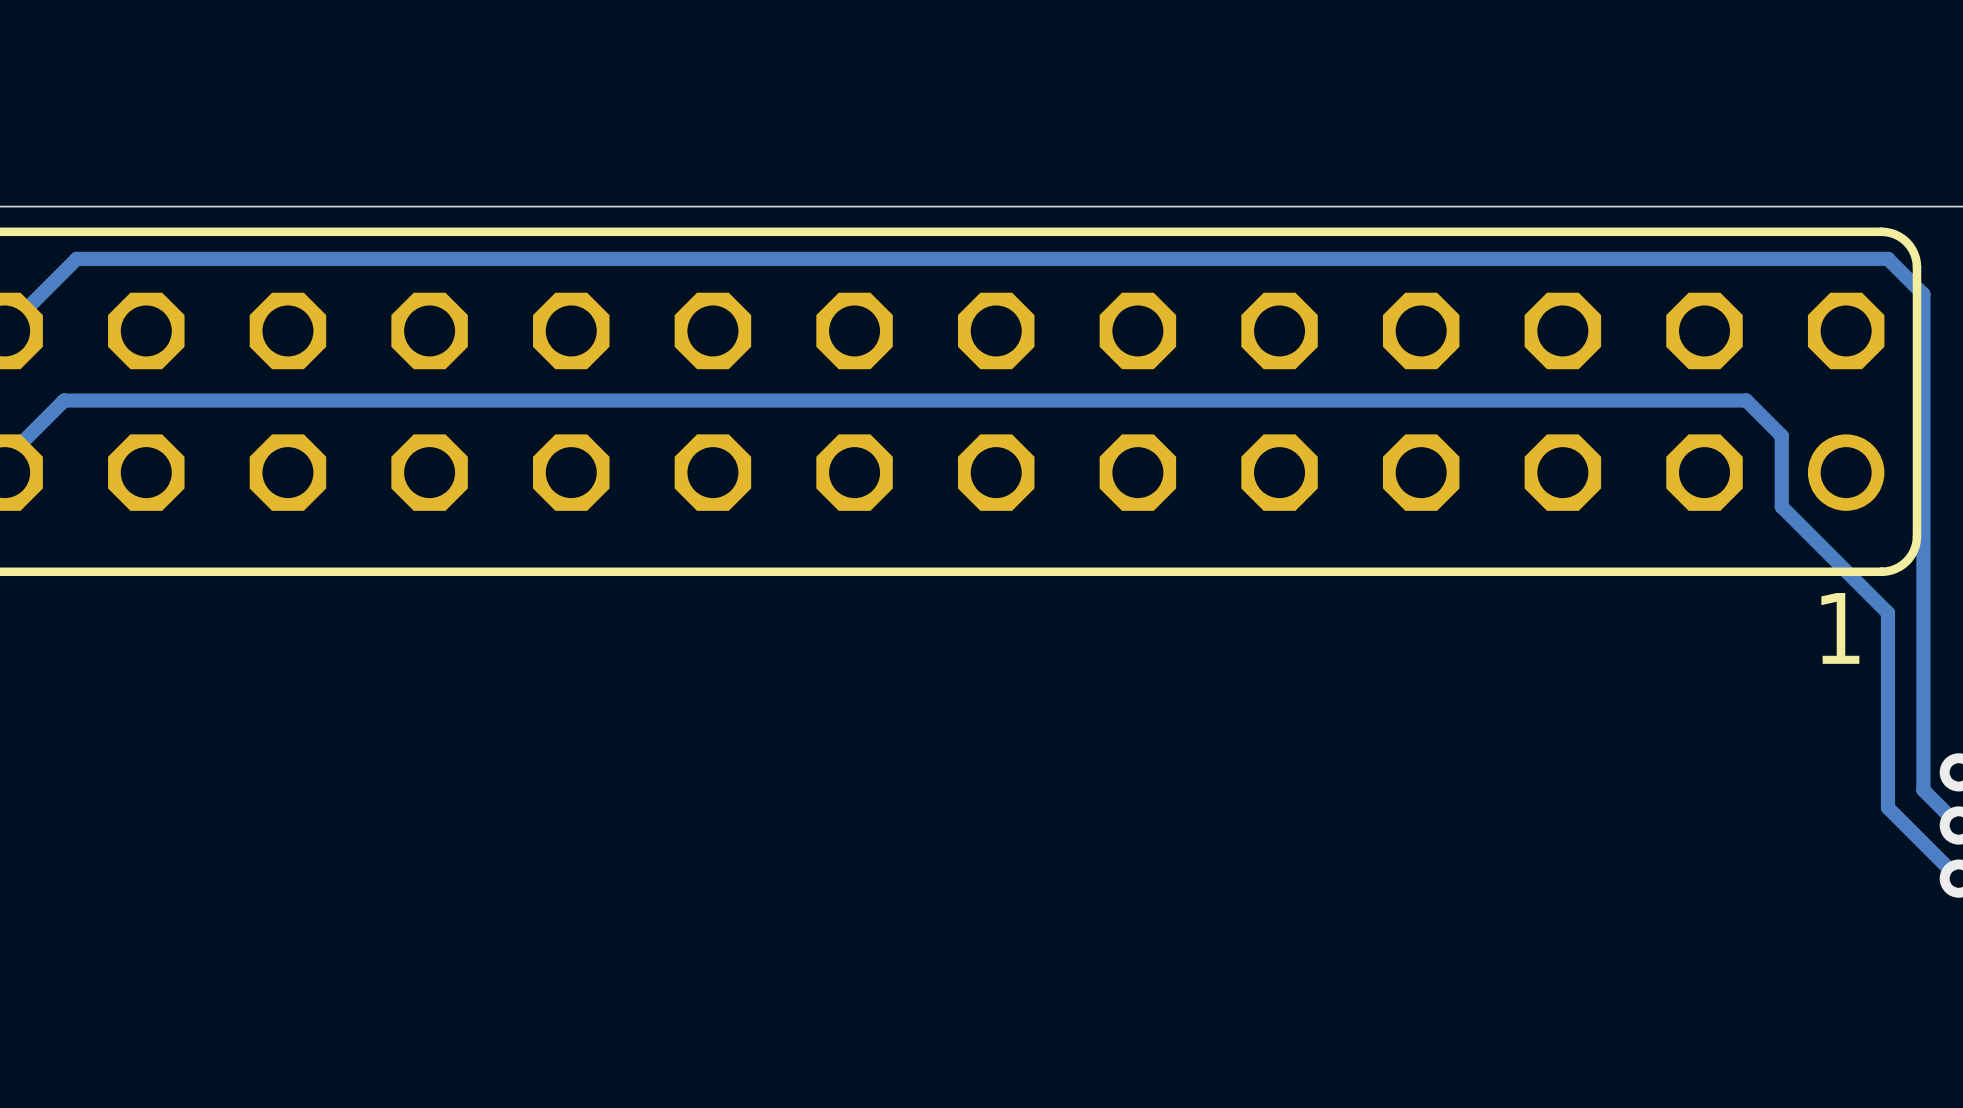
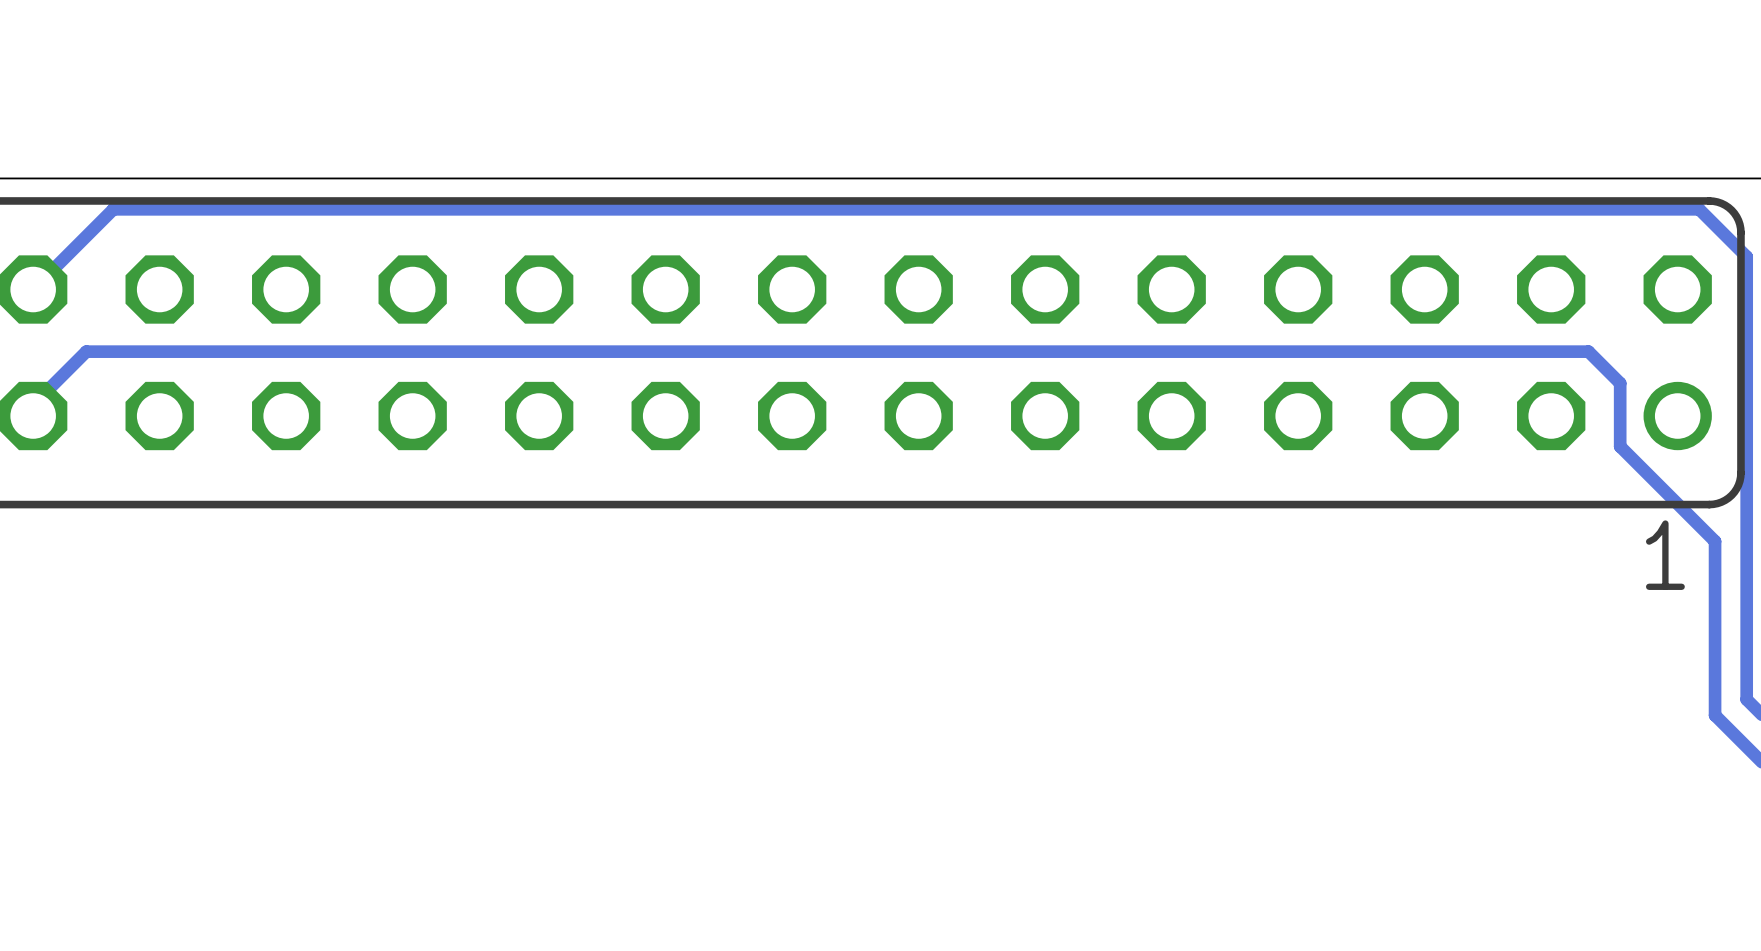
track: (1887, 258) (76, 258) -> (1715, 225) (1699, 209) (113, 209) (97, 225)

